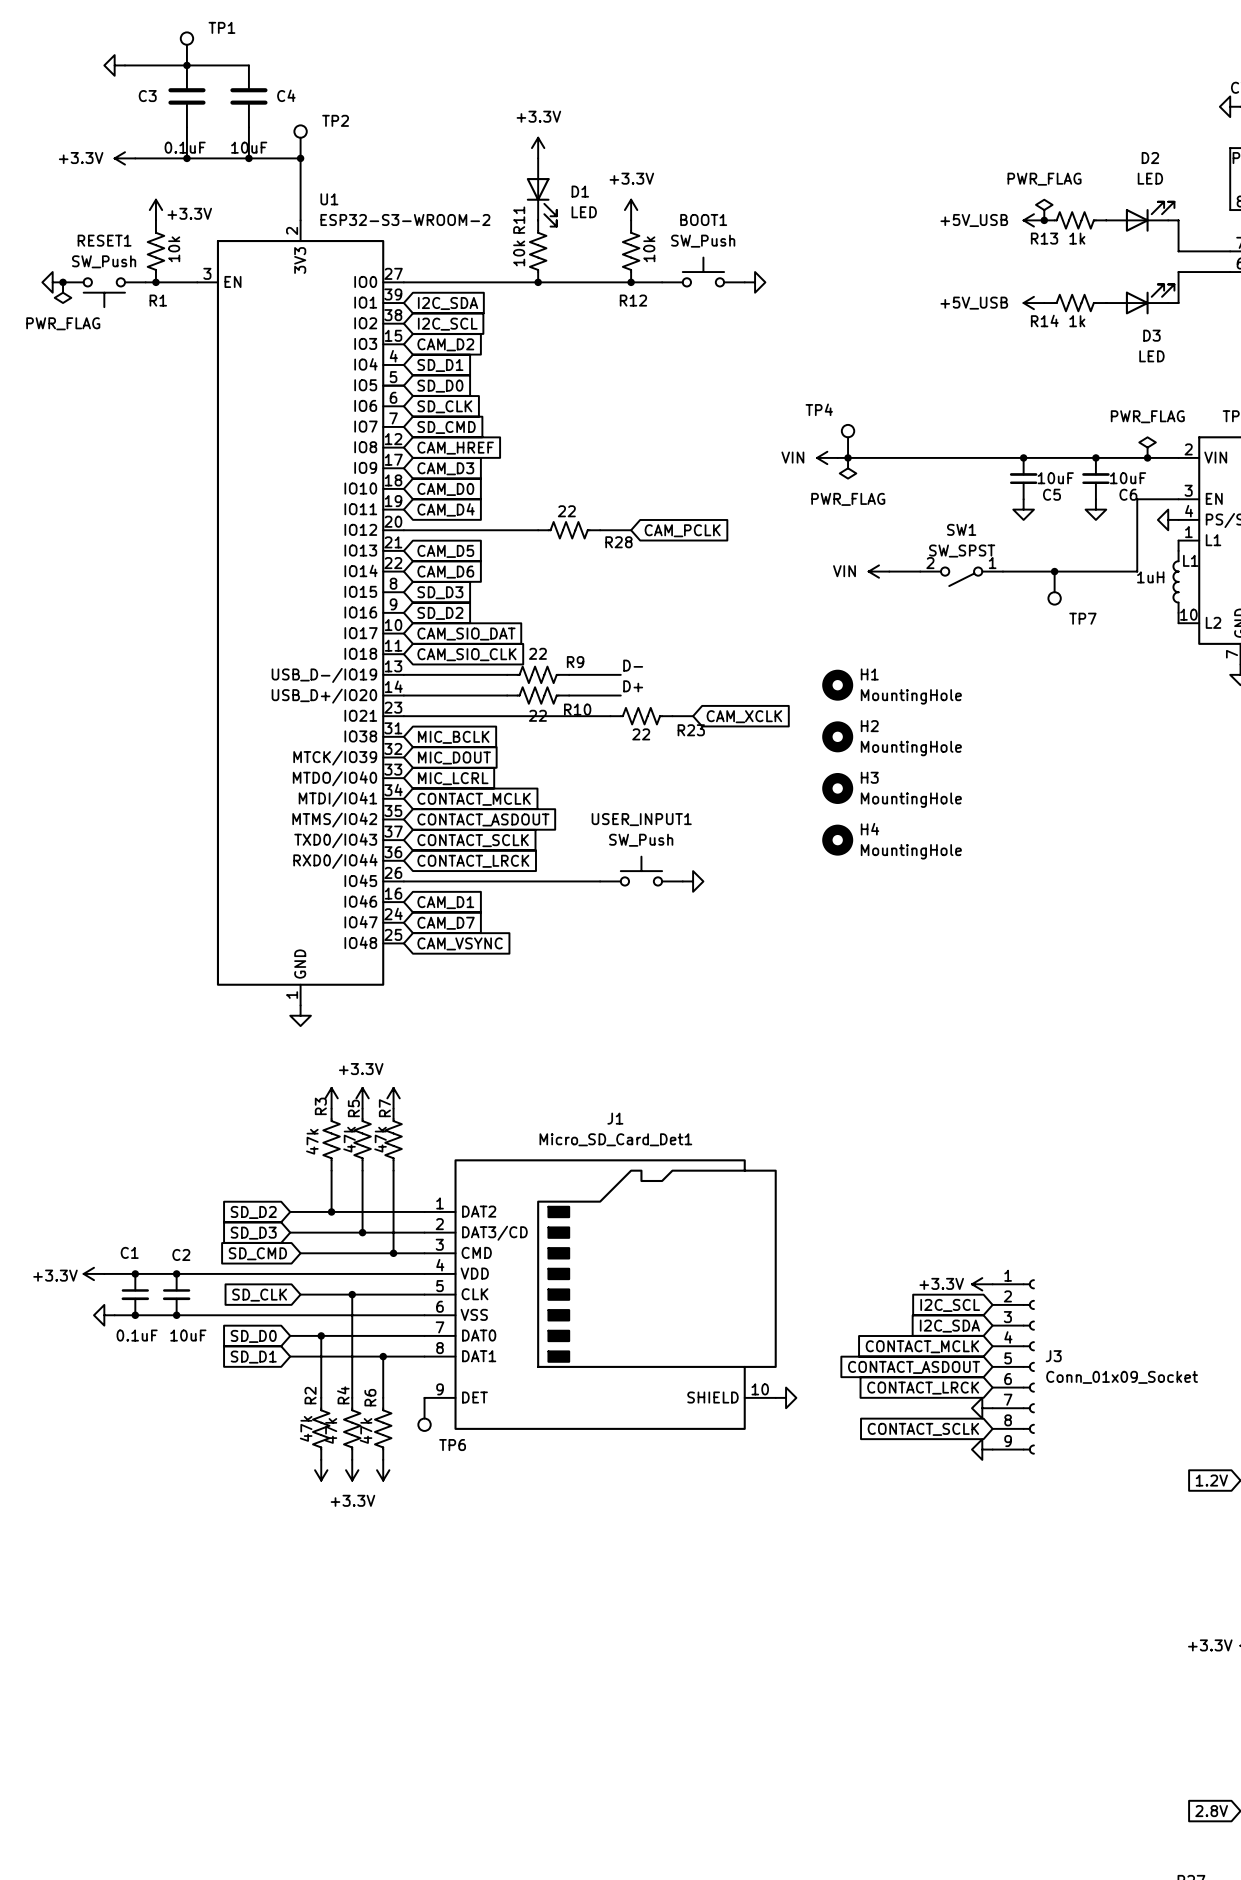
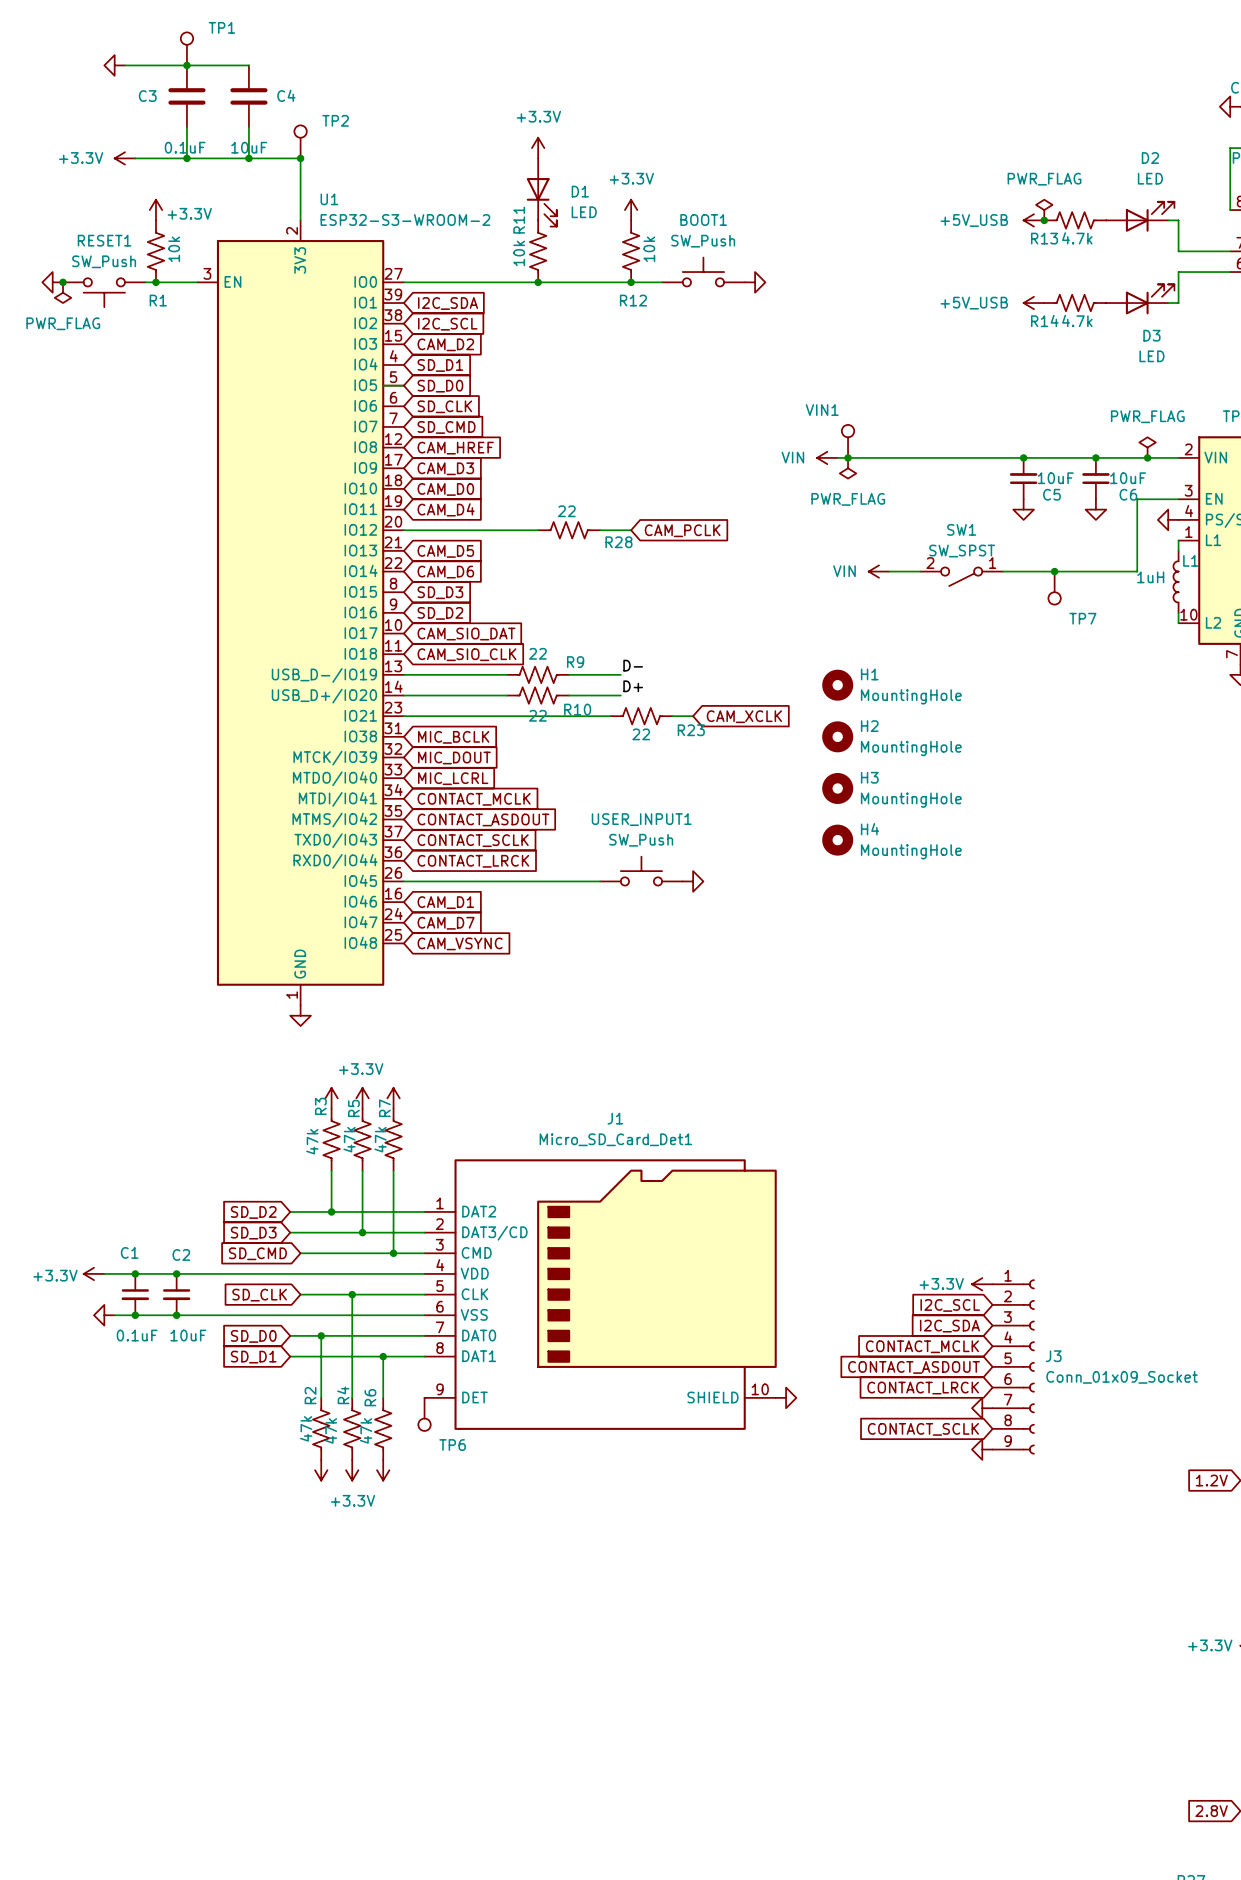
R13 value: 1k (1077, 238) -> 4.7k (1077, 238)
R14 value: 1k (1077, 321) -> 4.7k (1077, 320)
TP4 name: TP4 (819, 409) -> VIN1 (822, 410)

